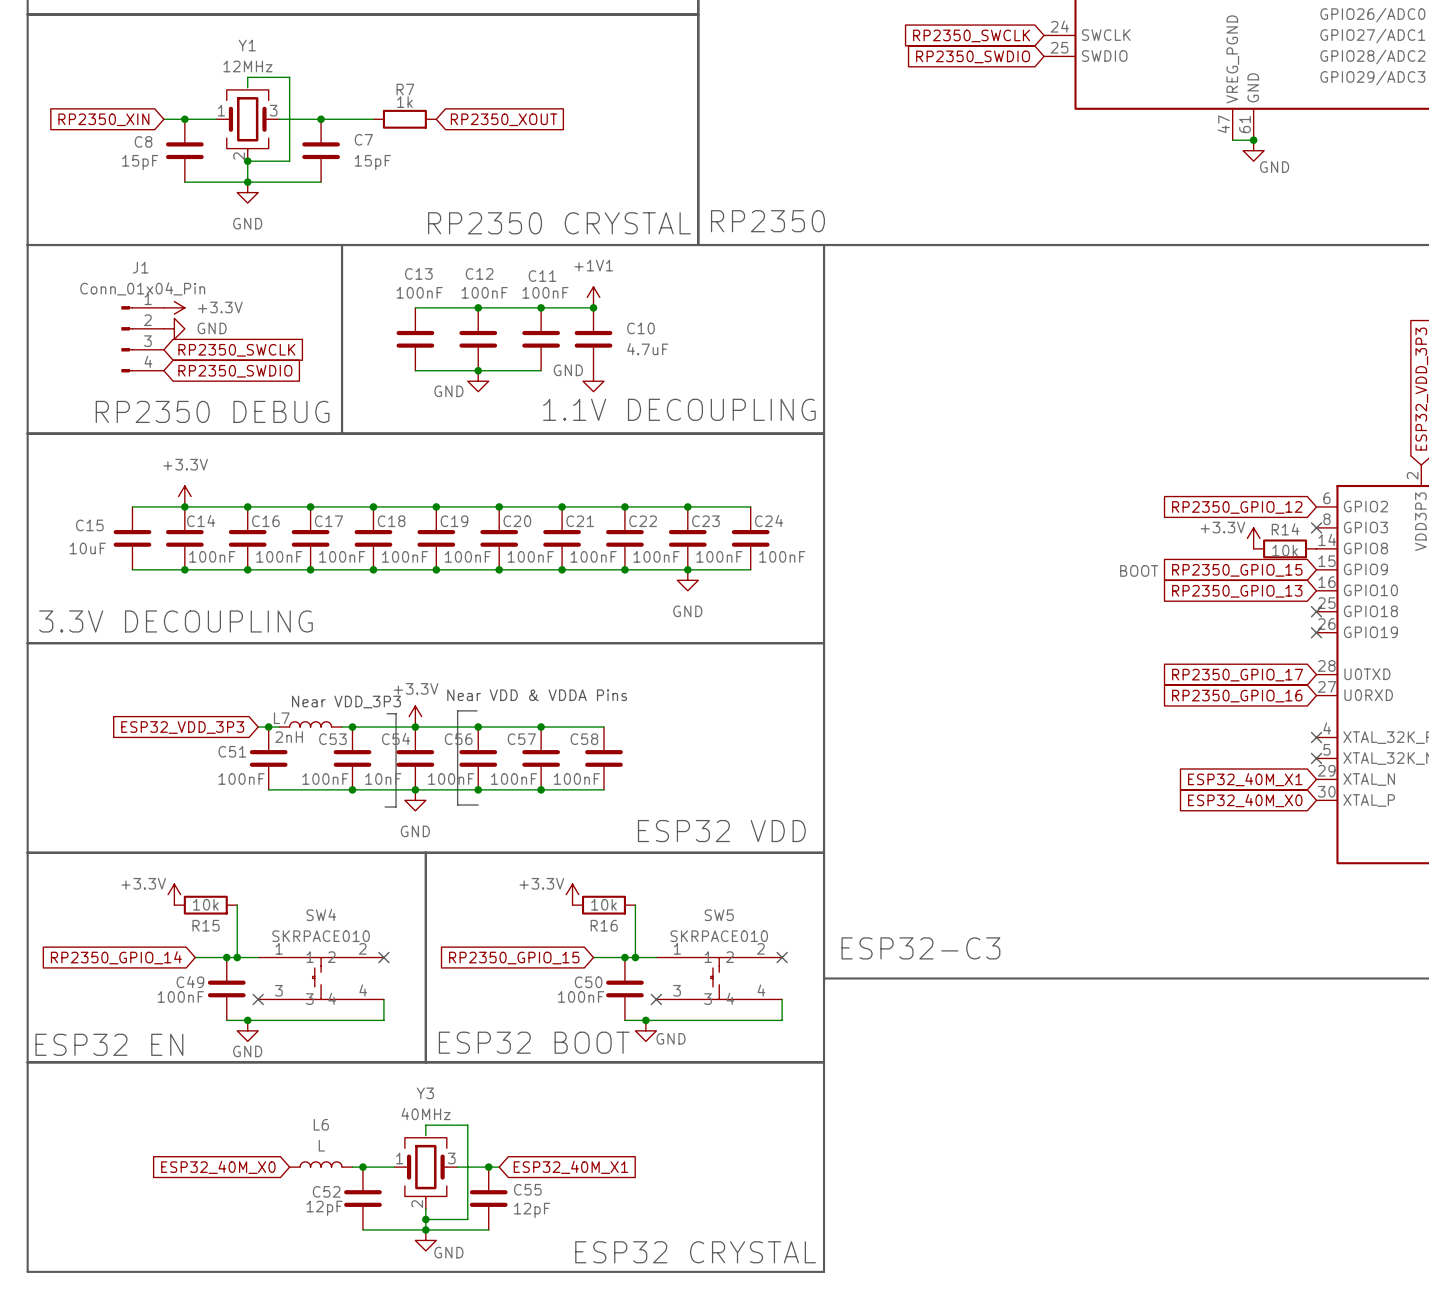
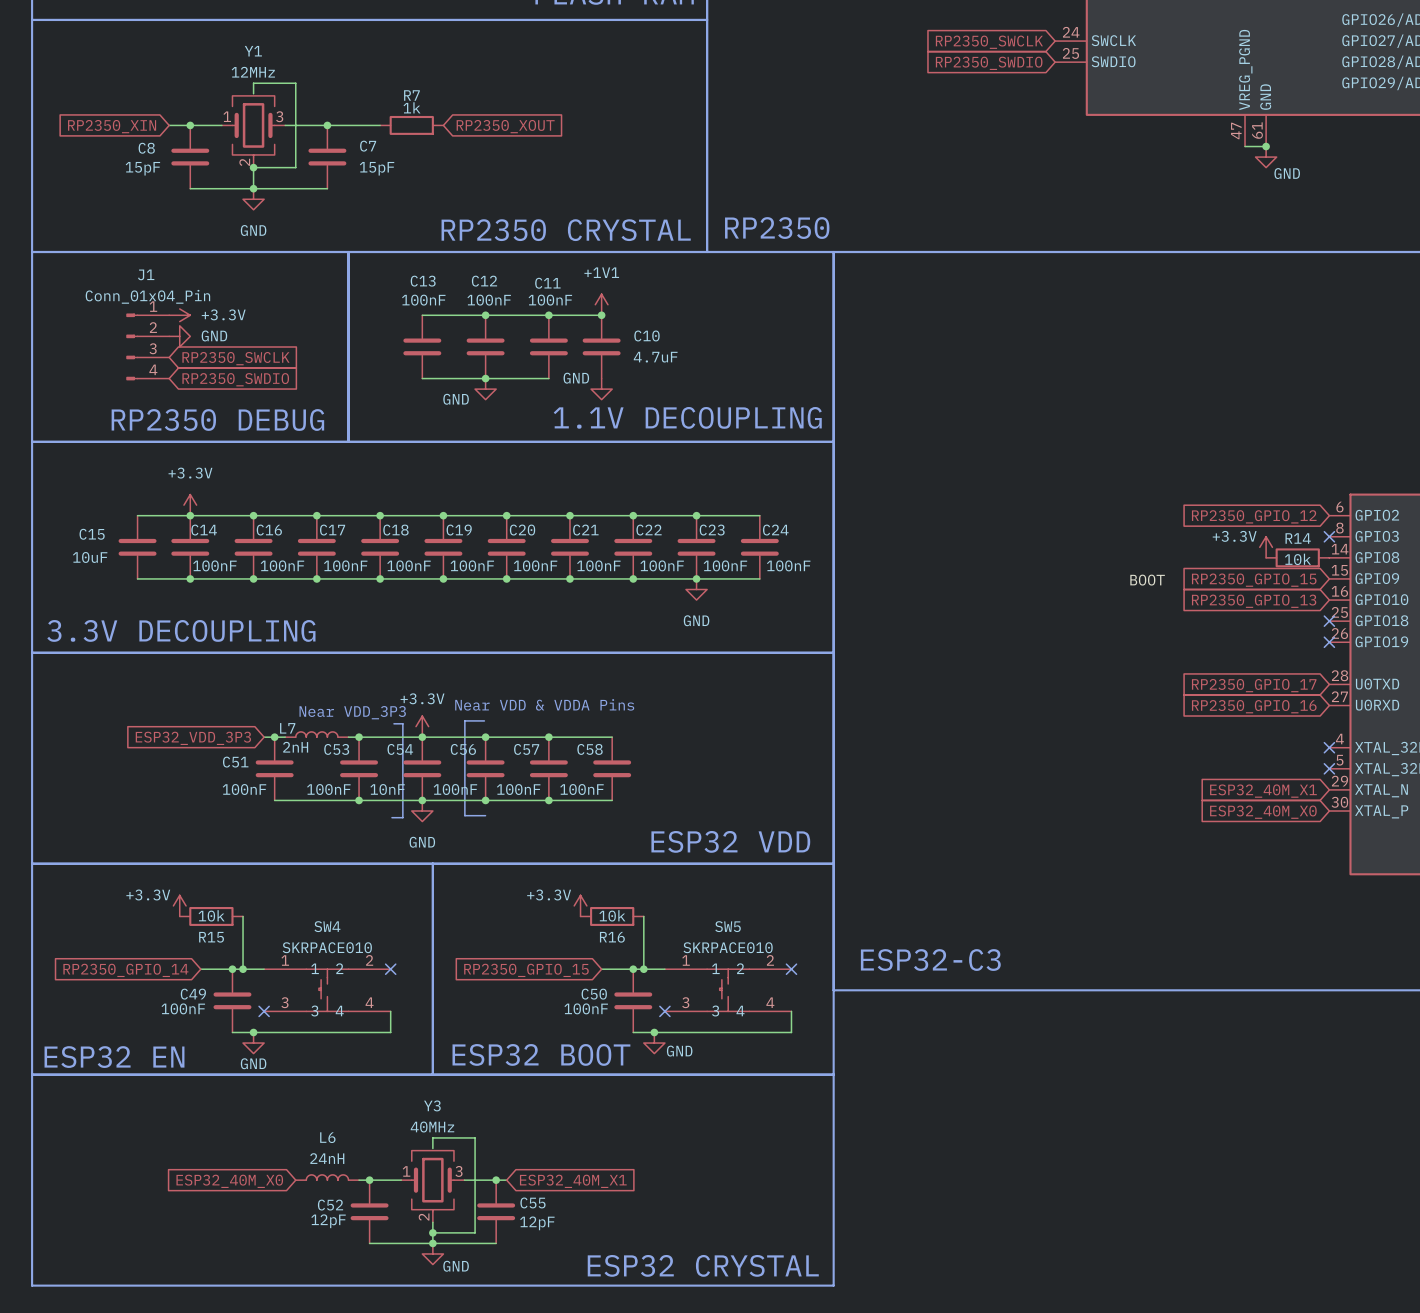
L6 value: L (321, 1145) -> 24nH (327, 1158)

